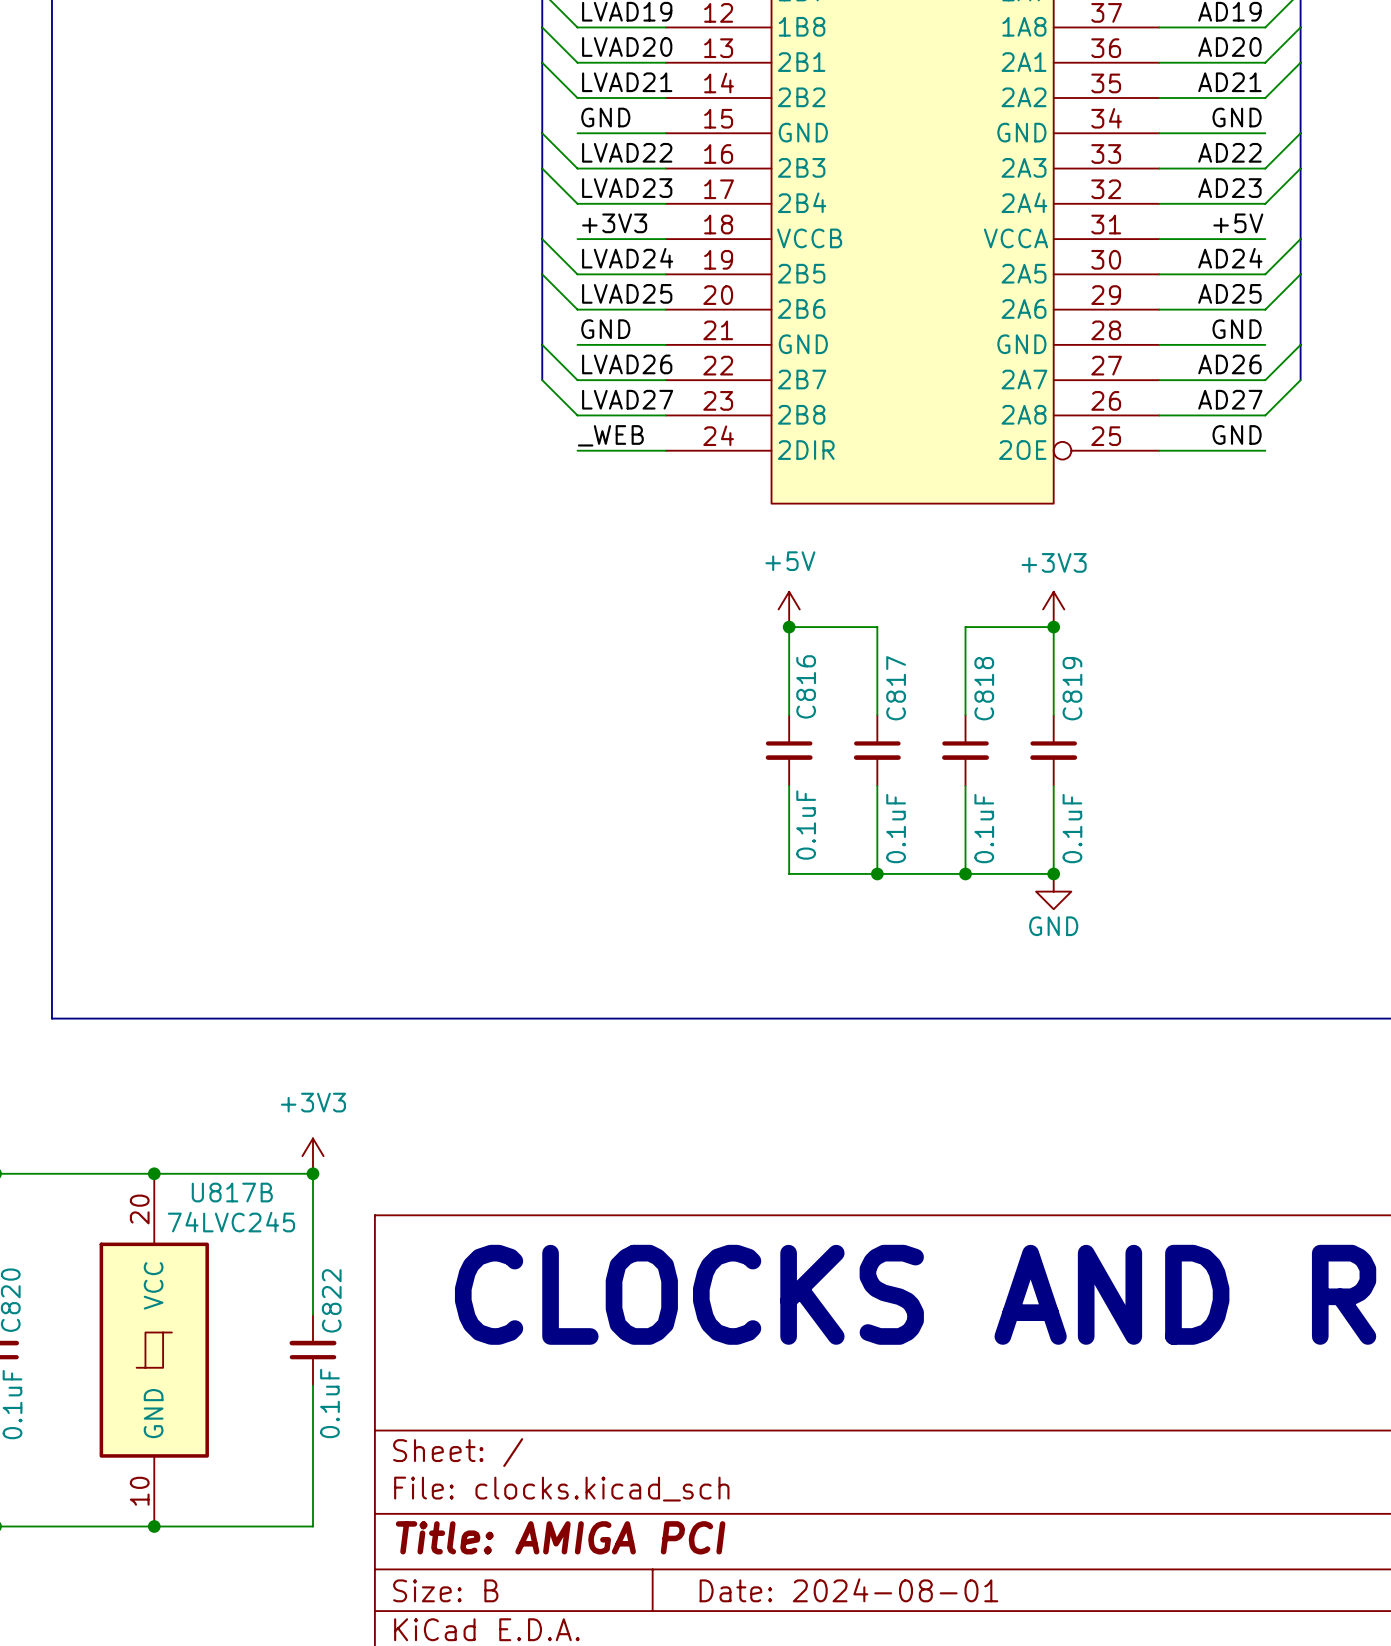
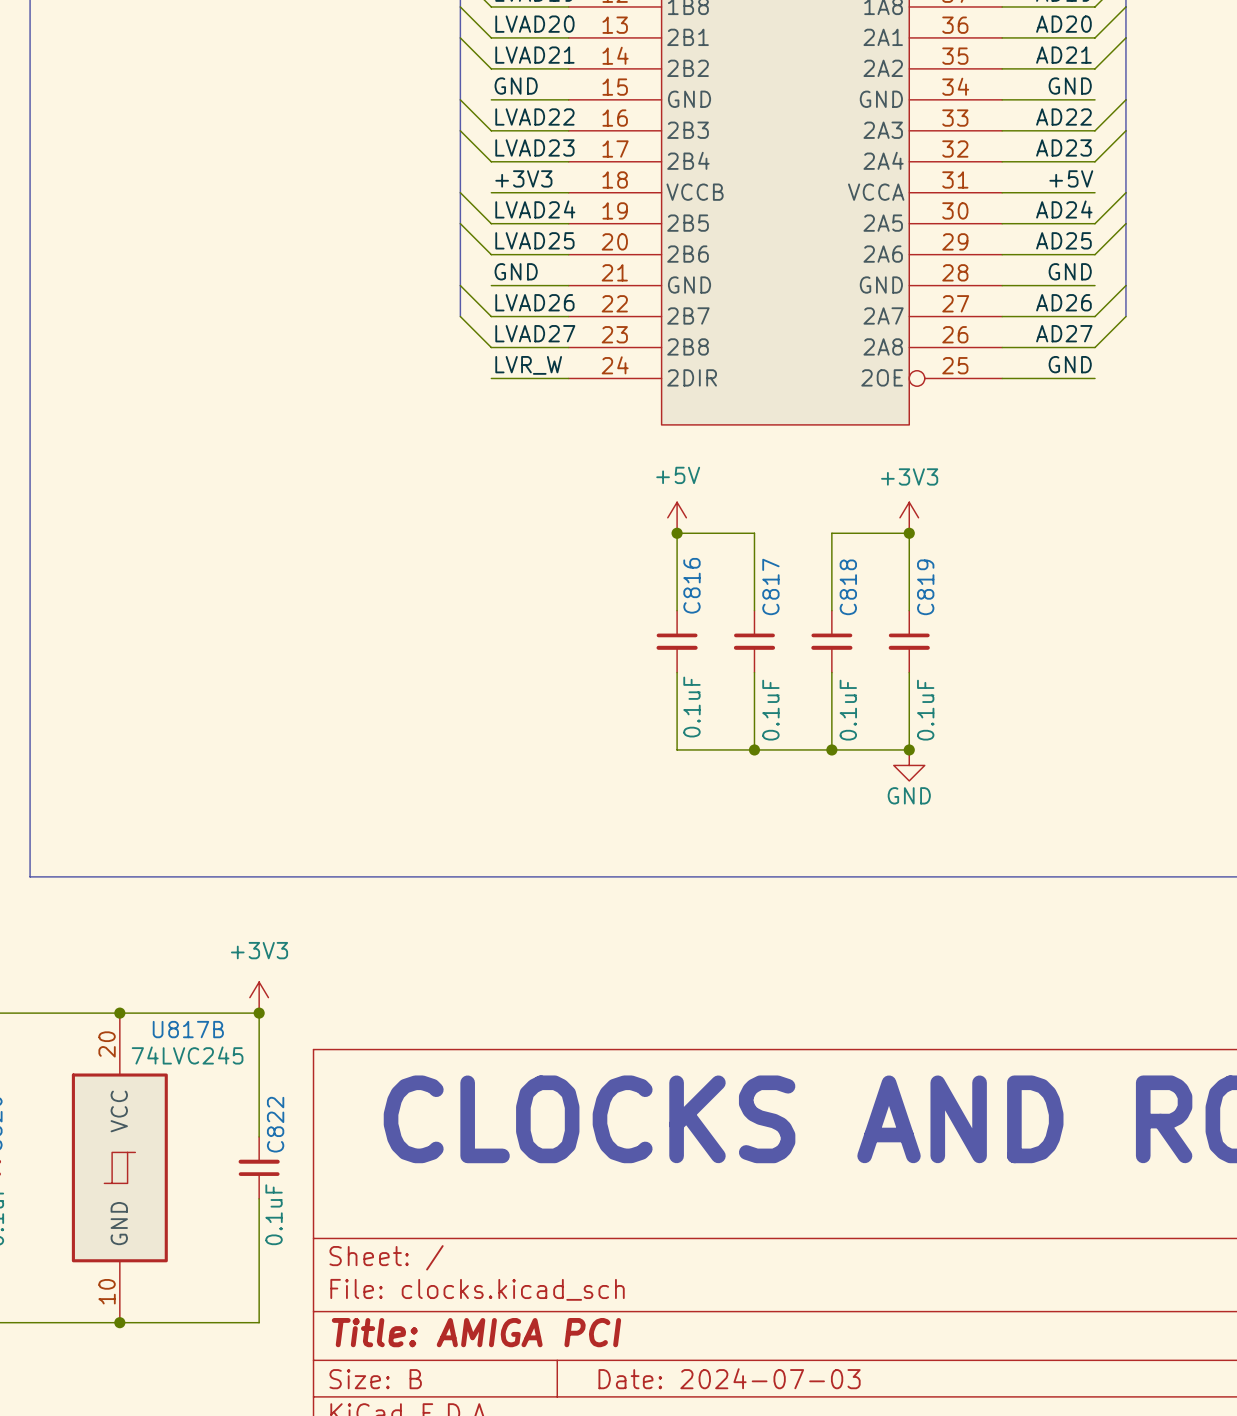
label: _WEB (610, 435) -> LVR_W (528, 365)
title block: Date: 2024-08-01 (848, 1590) -> Date: 2024-07-03 (729, 1378)

